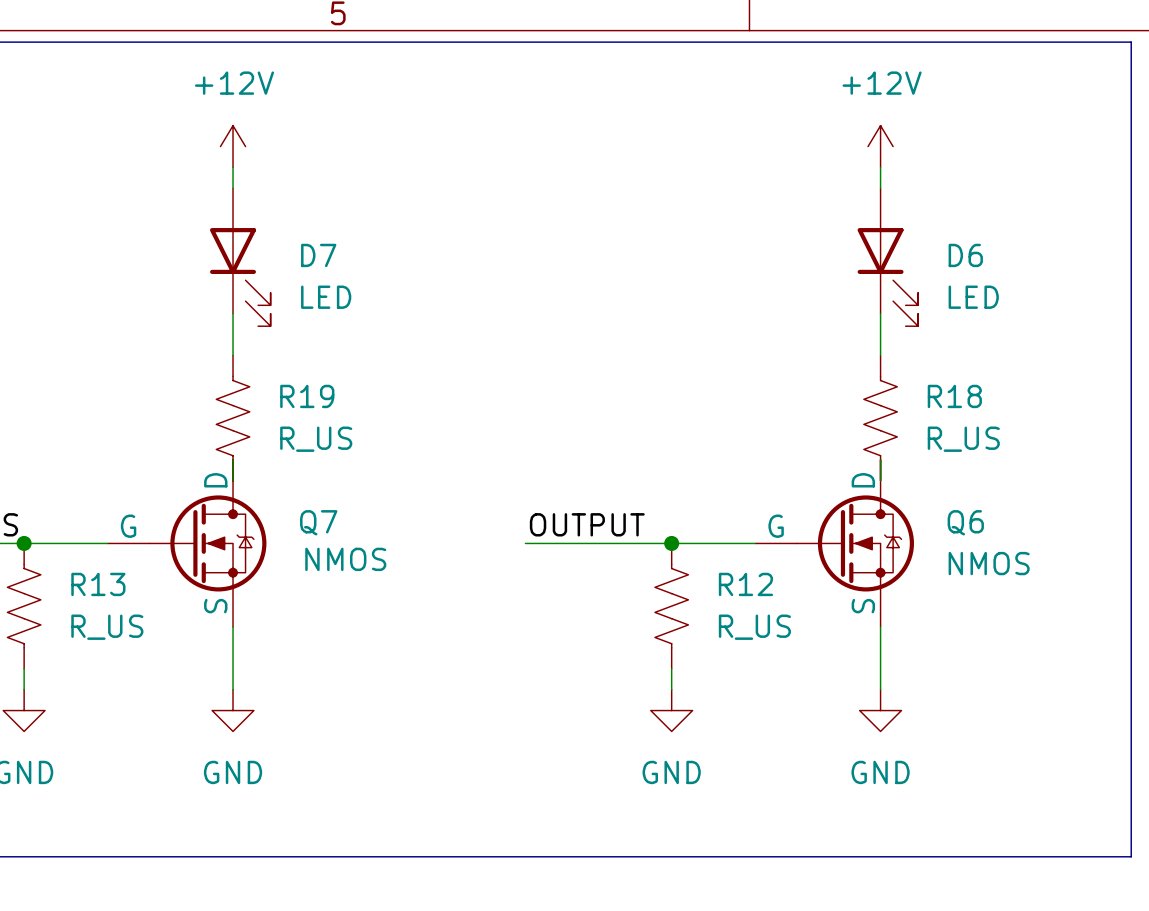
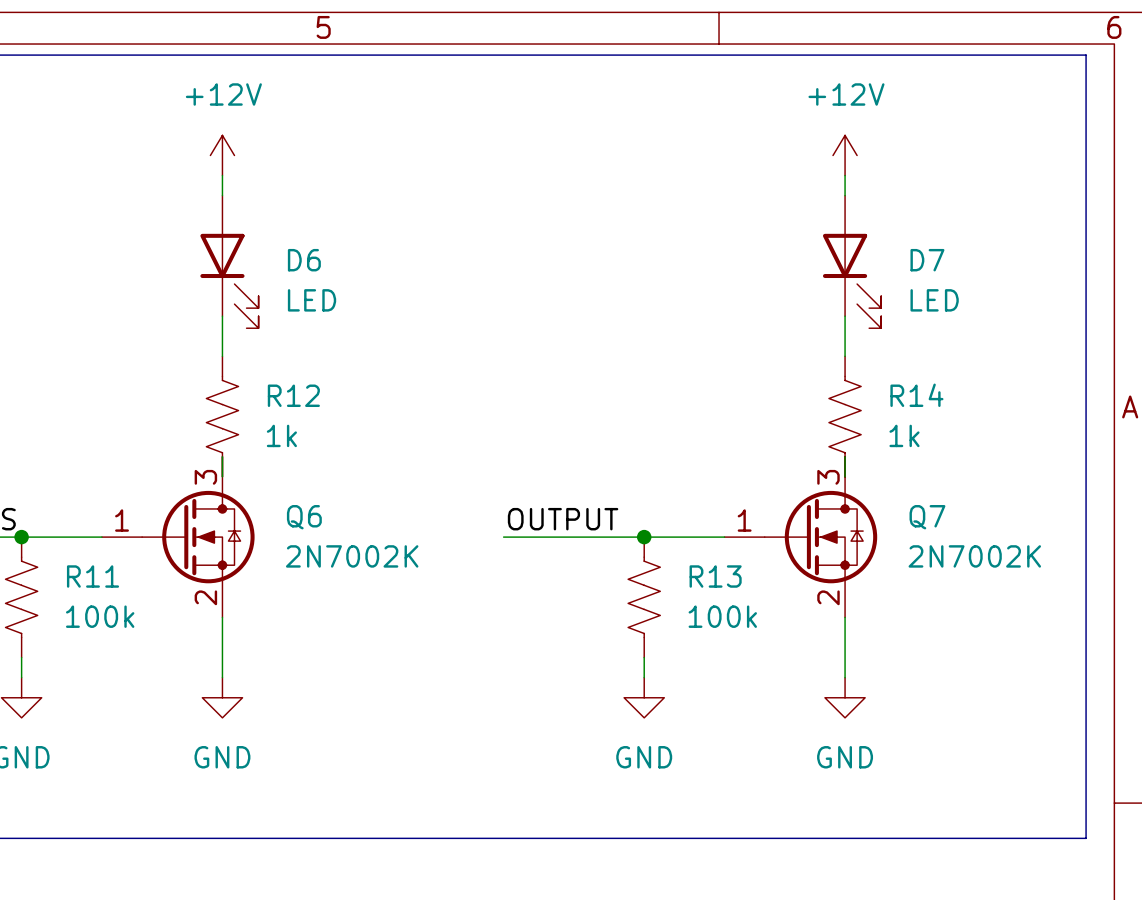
D7 name: D7 (318, 255) -> D6 (304, 260)
D6 name: D6 (965, 255) -> D7 (927, 260)
R19 name: R19 (307, 396) -> R12 (293, 395)
R18 name: R18 (954, 396) -> R14 (916, 395)
R19 value: R_US (316, 439) -> 1k (281, 435)
R18 value: R_US (963, 439) -> 1k (904, 435)
Q7 symbol: [107, 459, 267, 628] -> [724, 456, 878, 618]
Q6 symbol: [755, 459, 914, 628] -> [101, 456, 255, 618]
Q7 value: NMOS (345, 559) -> 2N7002K (974, 556)
Q6 value: NMOS (989, 563) -> 2N7002K (352, 556)
R13 name: R13 (98, 584) -> R11 (93, 576)
R12 name: R12 (745, 584) -> R13 (715, 576)
R13 value: R_US (107, 627) -> 100k (100, 616)
R12 value: R_US (754, 627) -> 100k (722, 616)

